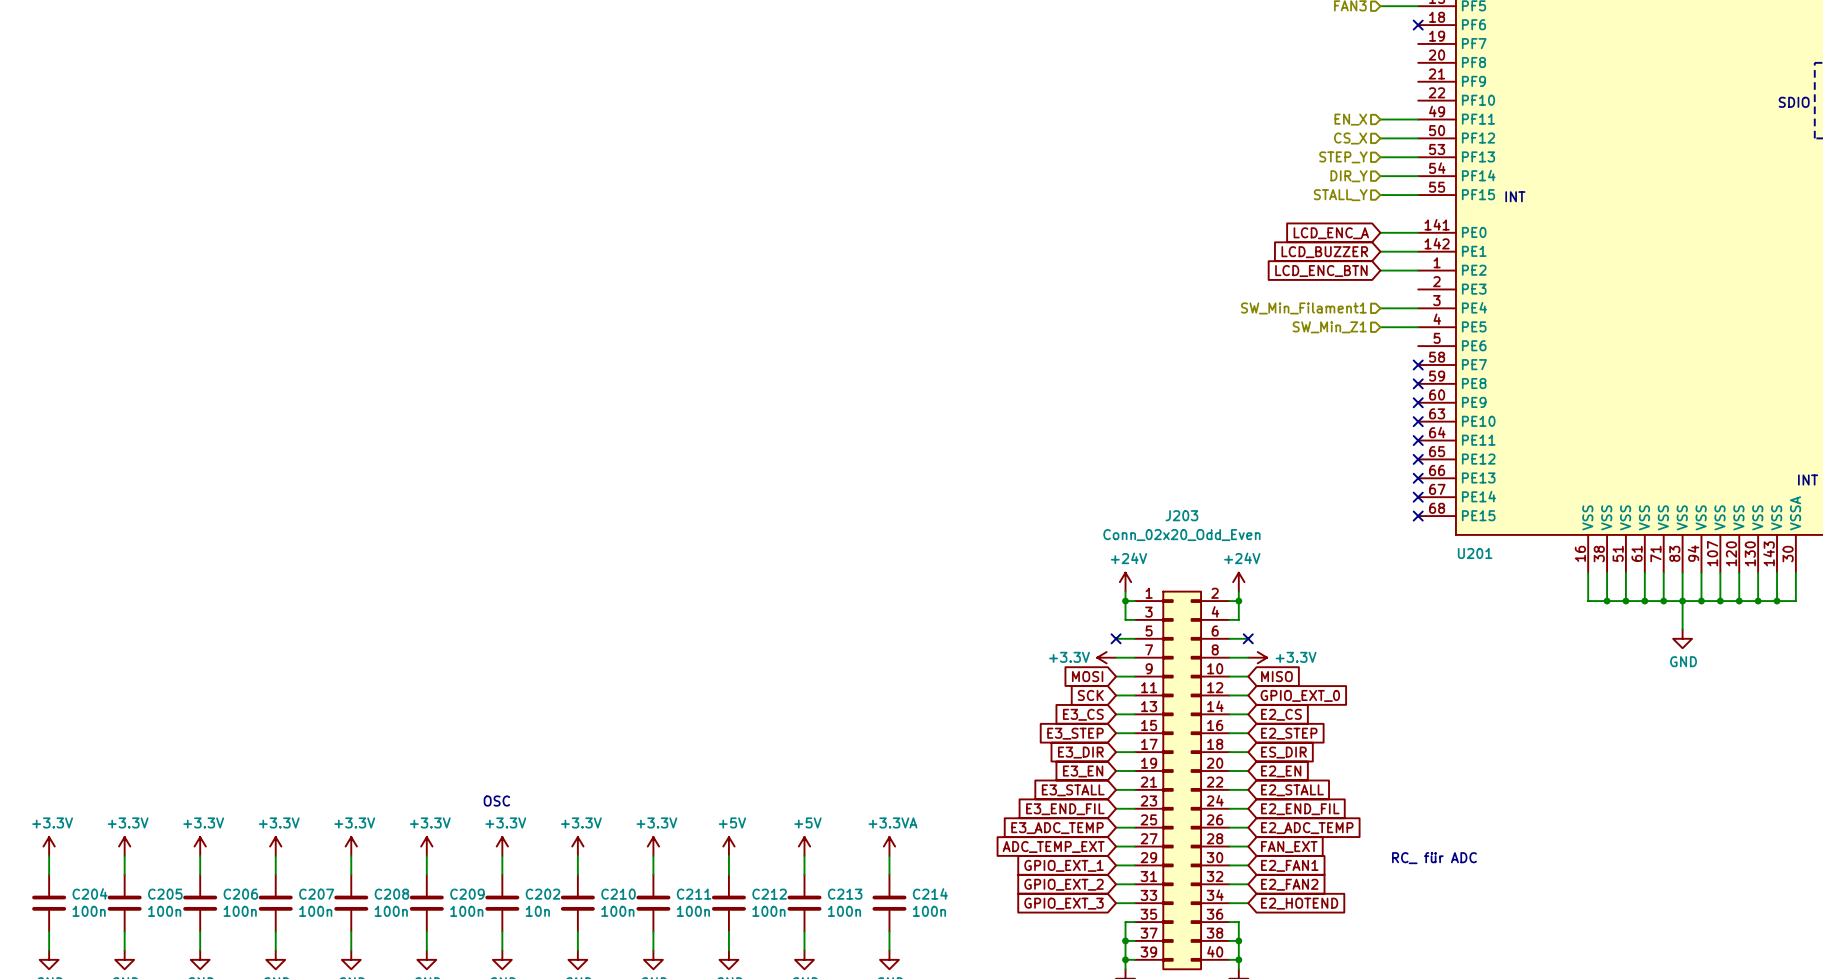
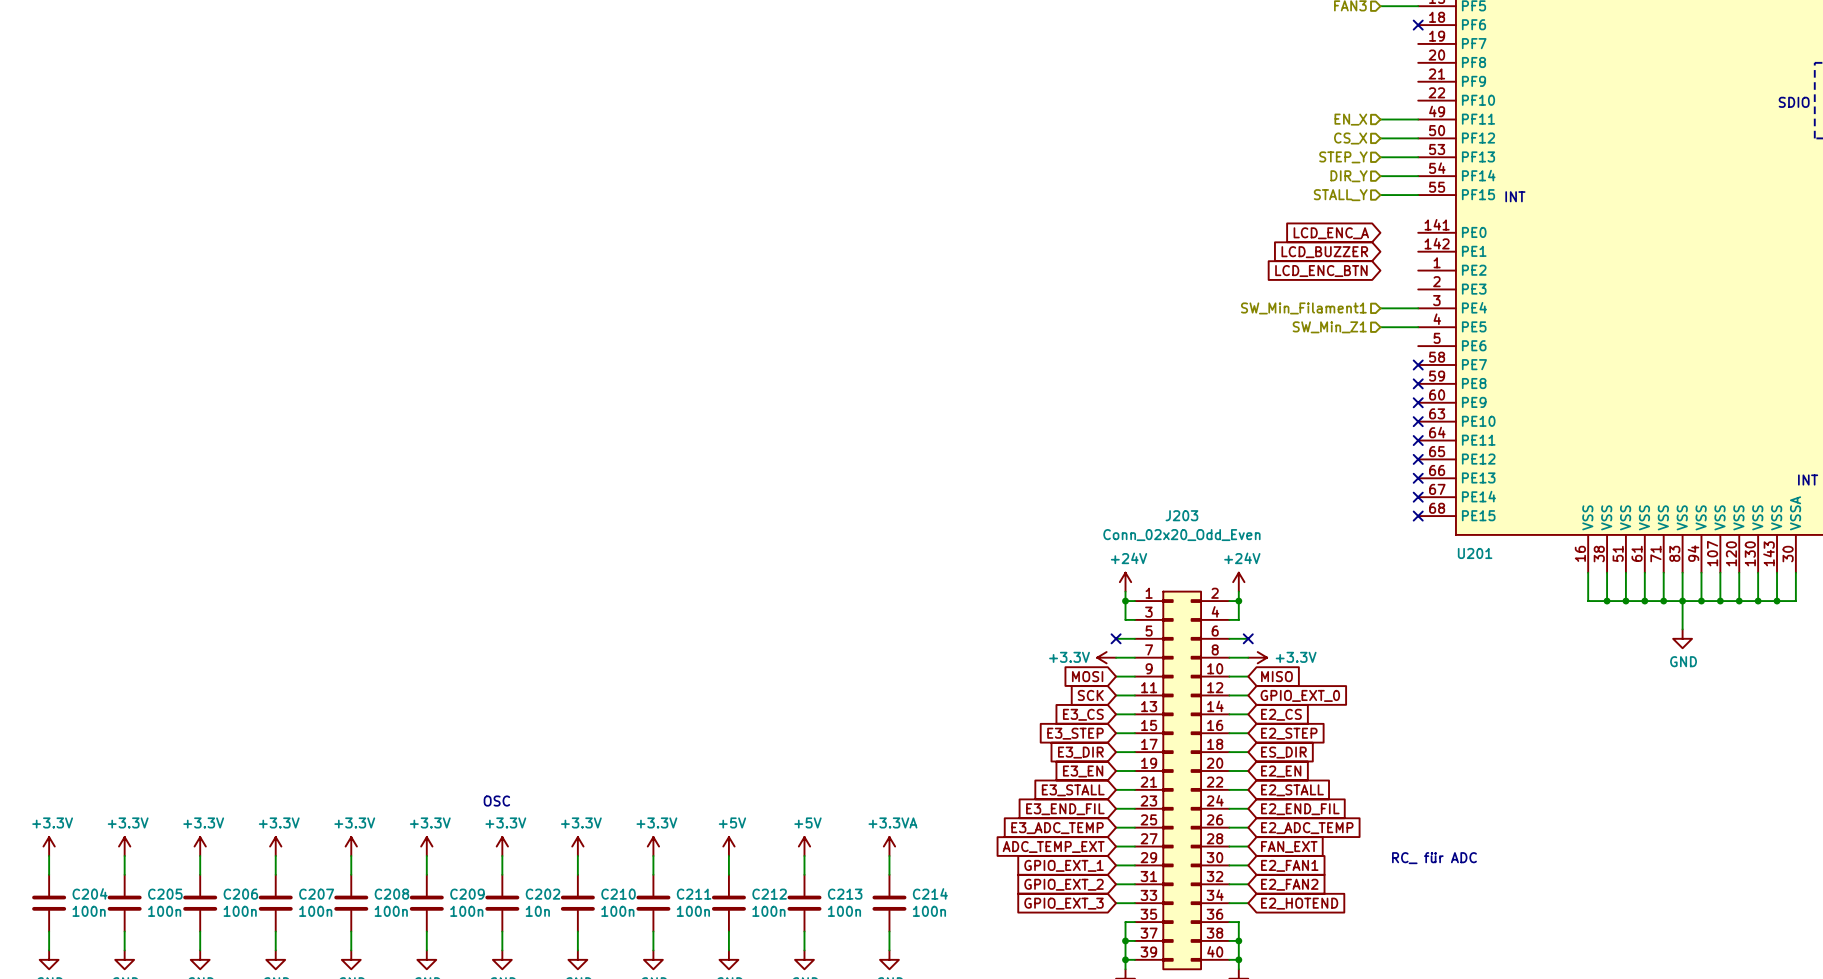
wire: (1380, 232) (1418, 232) -> none
wire: (1380, 251) (1418, 251) -> none
wire: (1380, 270) (1418, 270) -> none

